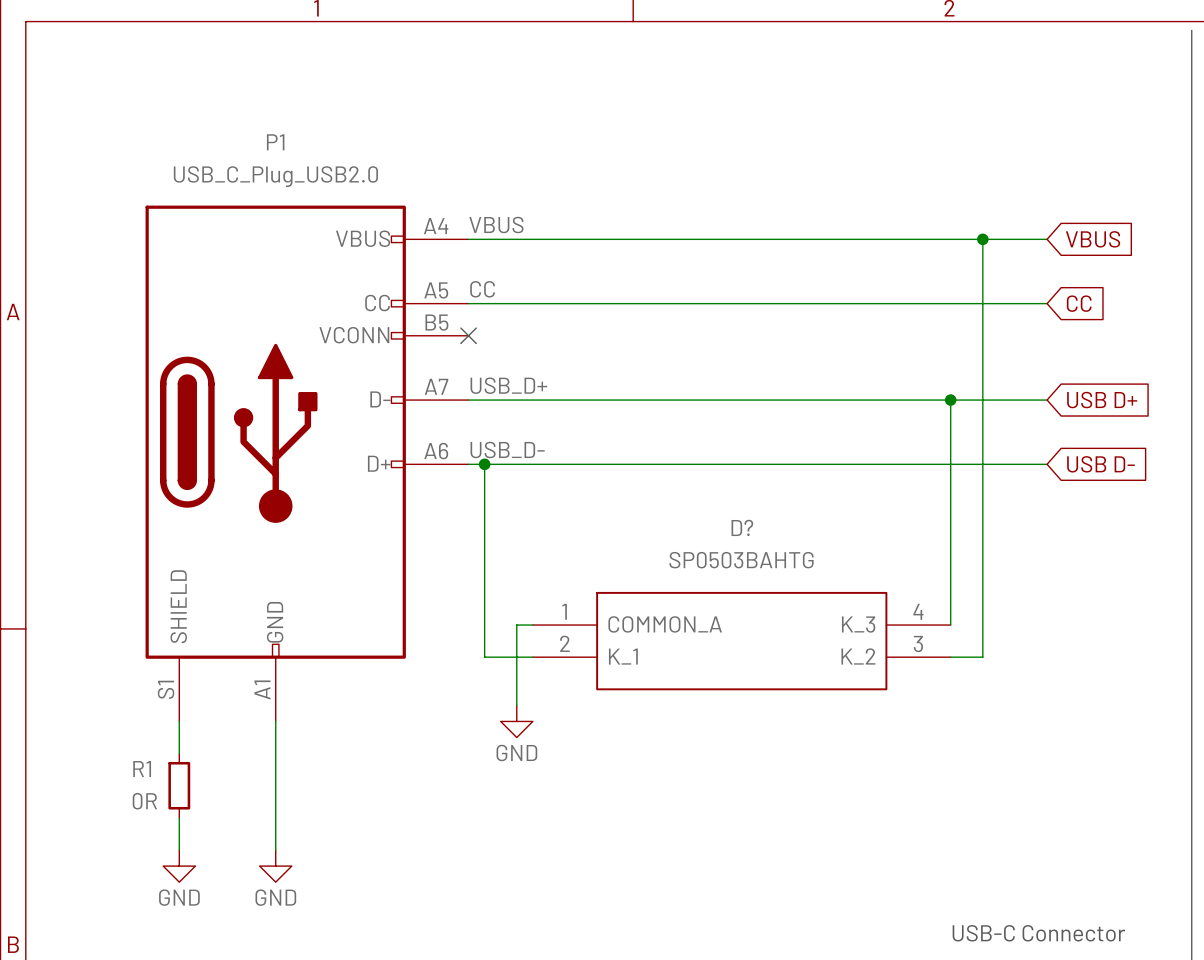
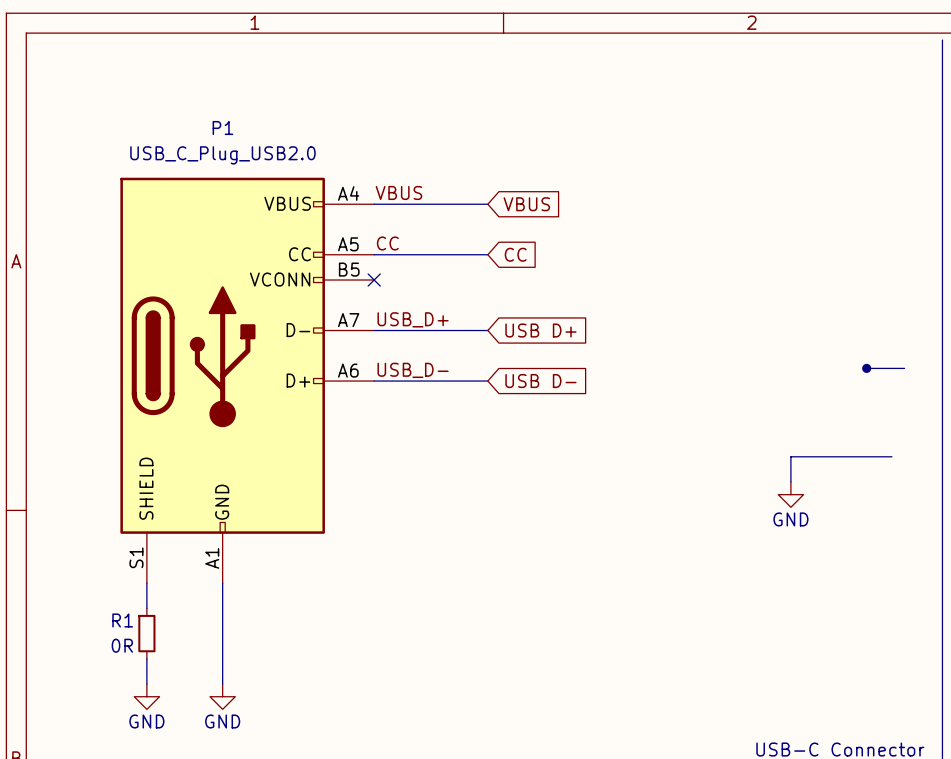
wire: (613, 239) (1047, 239) -> none
global label: none -> VBUS (526, 204)
wire: (982, 239) (982, 657) (950, 657) -> none
junction: (982, 239) -> none
global label: VBUS (1093, 239) -> none
wire: (613, 303) (1047, 303) -> none
global label: none -> CC (515, 254)
global label: CC (1079, 303) -> none
wire: (613, 400) (1047, 400) -> none
global label: none -> USB D+ (540, 330)
wire: (950, 400) (950, 625) -> none
junction: (950, 400) -> none
global label: USB D+ (1102, 400) -> none
junction: none -> (866, 368)
wire: (484, 464) (484, 657) (532, 657) -> none
junction: (484, 464) -> none
wire: (613, 464) (1047, 464) -> none
global label: none -> USB D- (540, 381)
global label: USB D- (1100, 464) -> none
wire: none -> (891, 456) (790, 456) (790, 482)
power symbol: none -> GND (790, 494)
wire: (532, 625) (516, 625) (516, 705) -> none
D?: SP0503BAHTG (741, 641) -> none
power symbol: GND (516, 721) -> none

